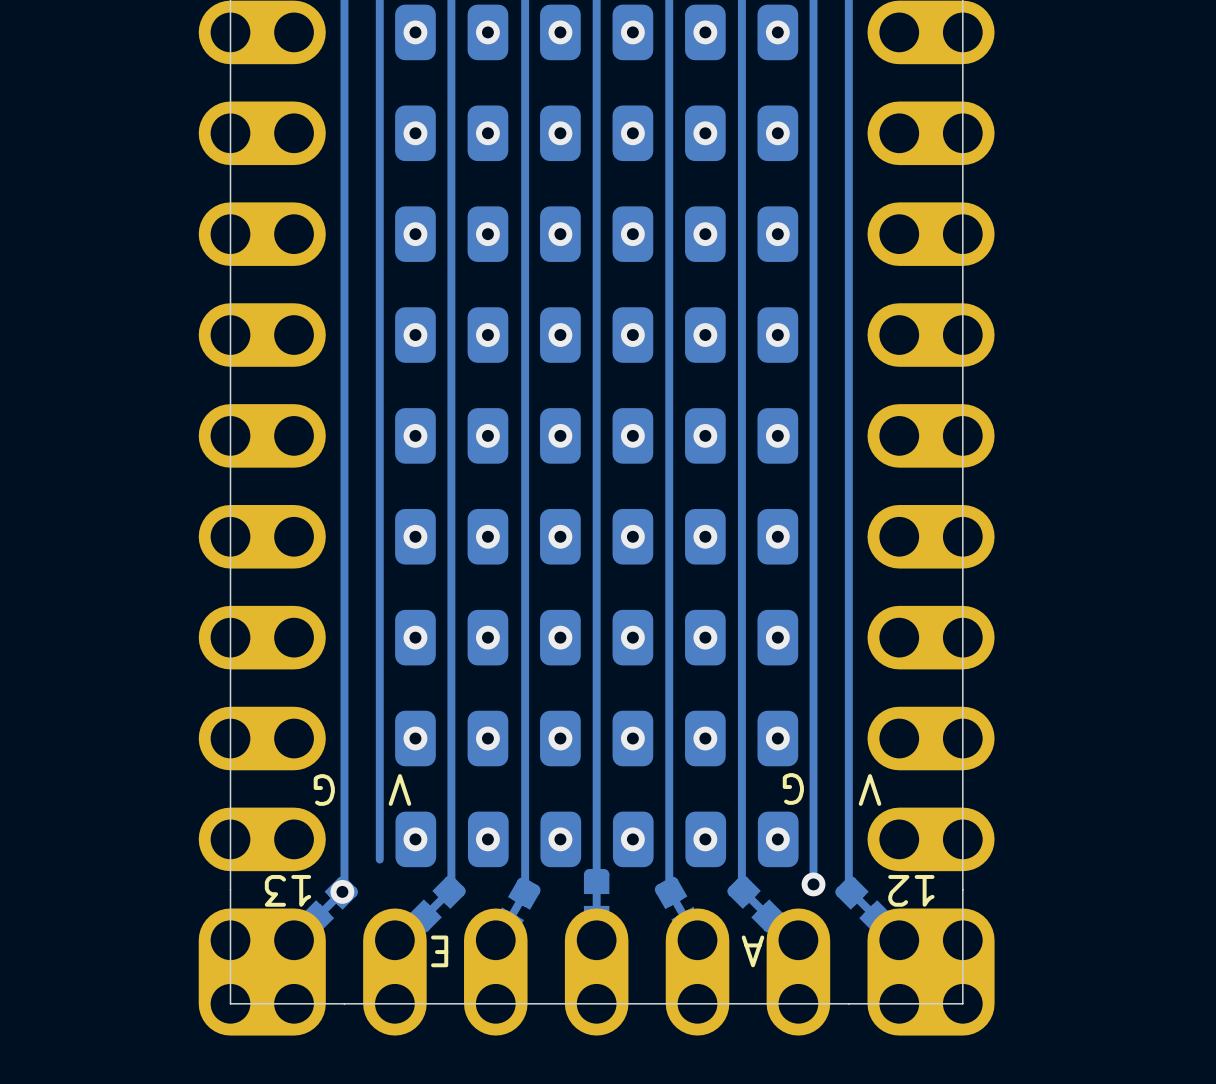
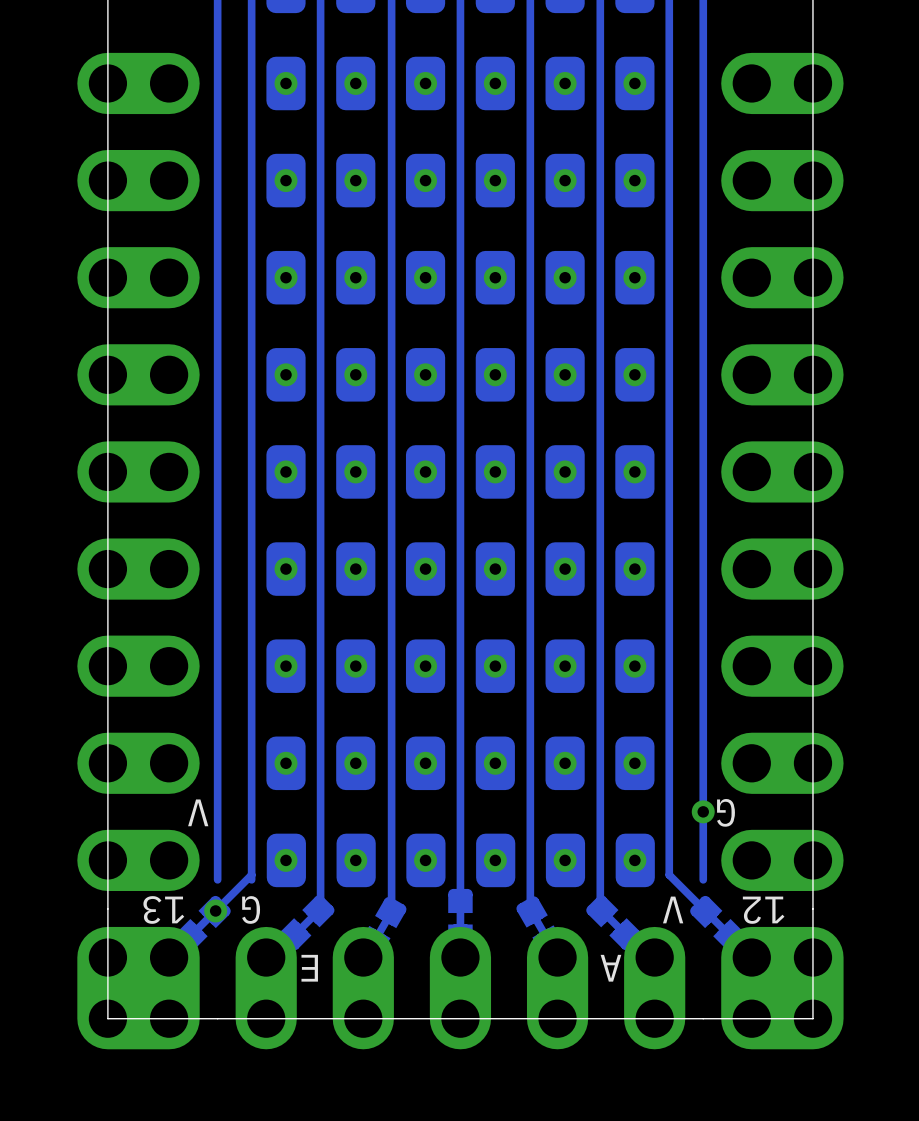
text position: G (793, 788) -> G (251, 909)
text: G (324, 789) -> V (198, 812)
text position: V (399, 789) -> V (673, 909)
text: V (870, 789) -> G (726, 812)
track: (813, 854) (813, 884) -> none
track: (344, 859) (344, 889) -> (251, 874) (217, 908)
track: (848, 859) (848, 889) -> (669, 874) (703, 908)
via position: (813, 884) -> (703, 811)

